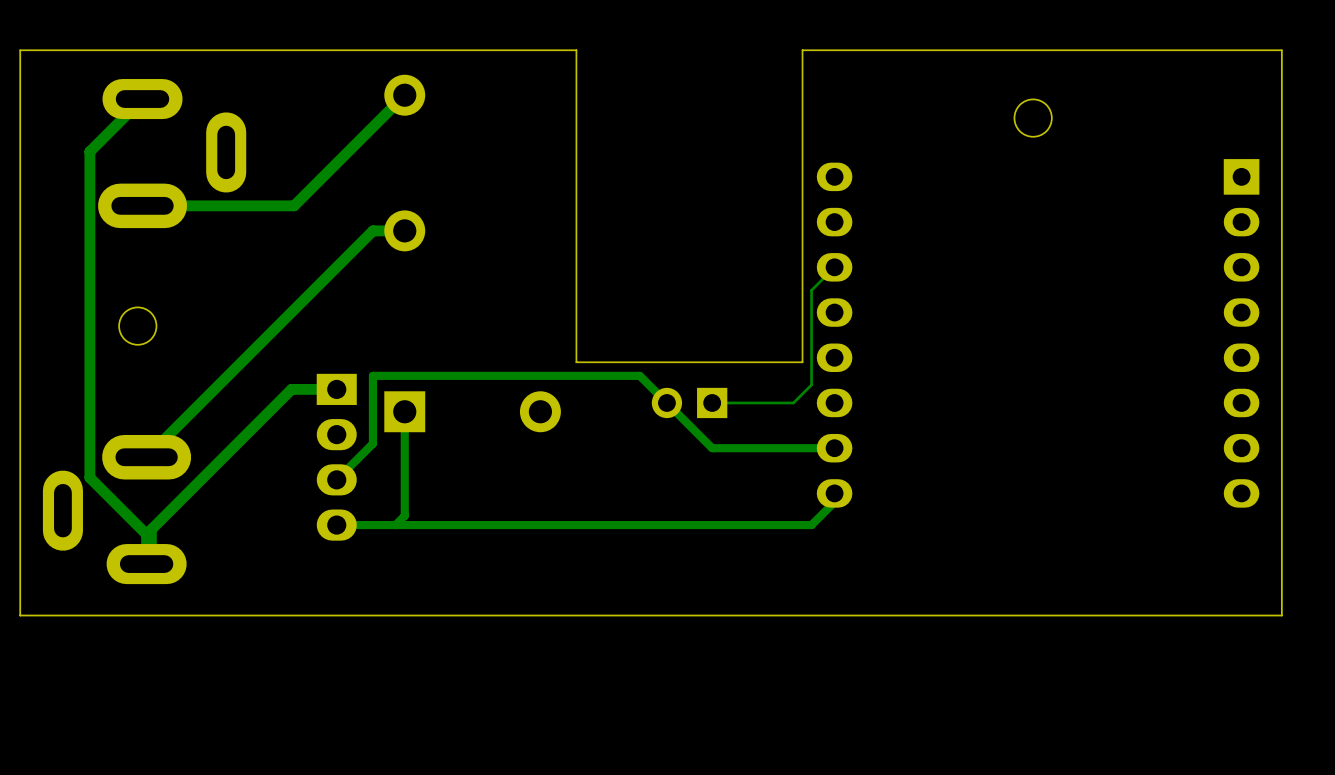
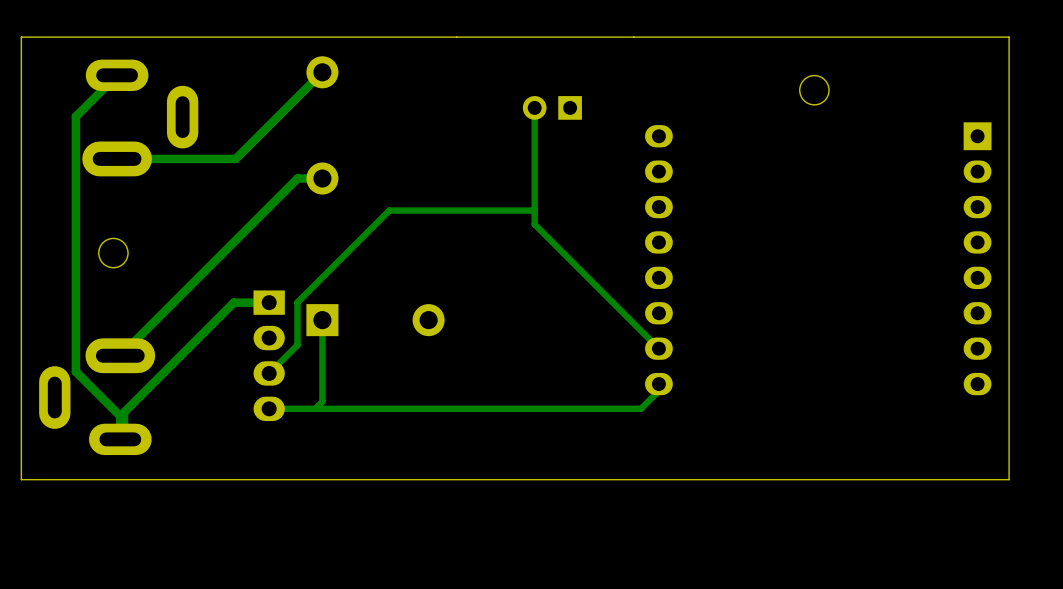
board edge: (802, 50) (802, 362) (576, 362) (576, 50) -> (633, 37) (456, 37)
track: none -> (534, 107) (534, 224) (658, 348)
track: (834, 267) (811, 290) (811, 384) (793, 402) (712, 402) -> none
track: (372, 389) (372, 375) (639, 375) (712, 448) (834, 448) -> (297, 302) (389, 210) (534, 210)
part position: (689, 402) -> (552, 107)

